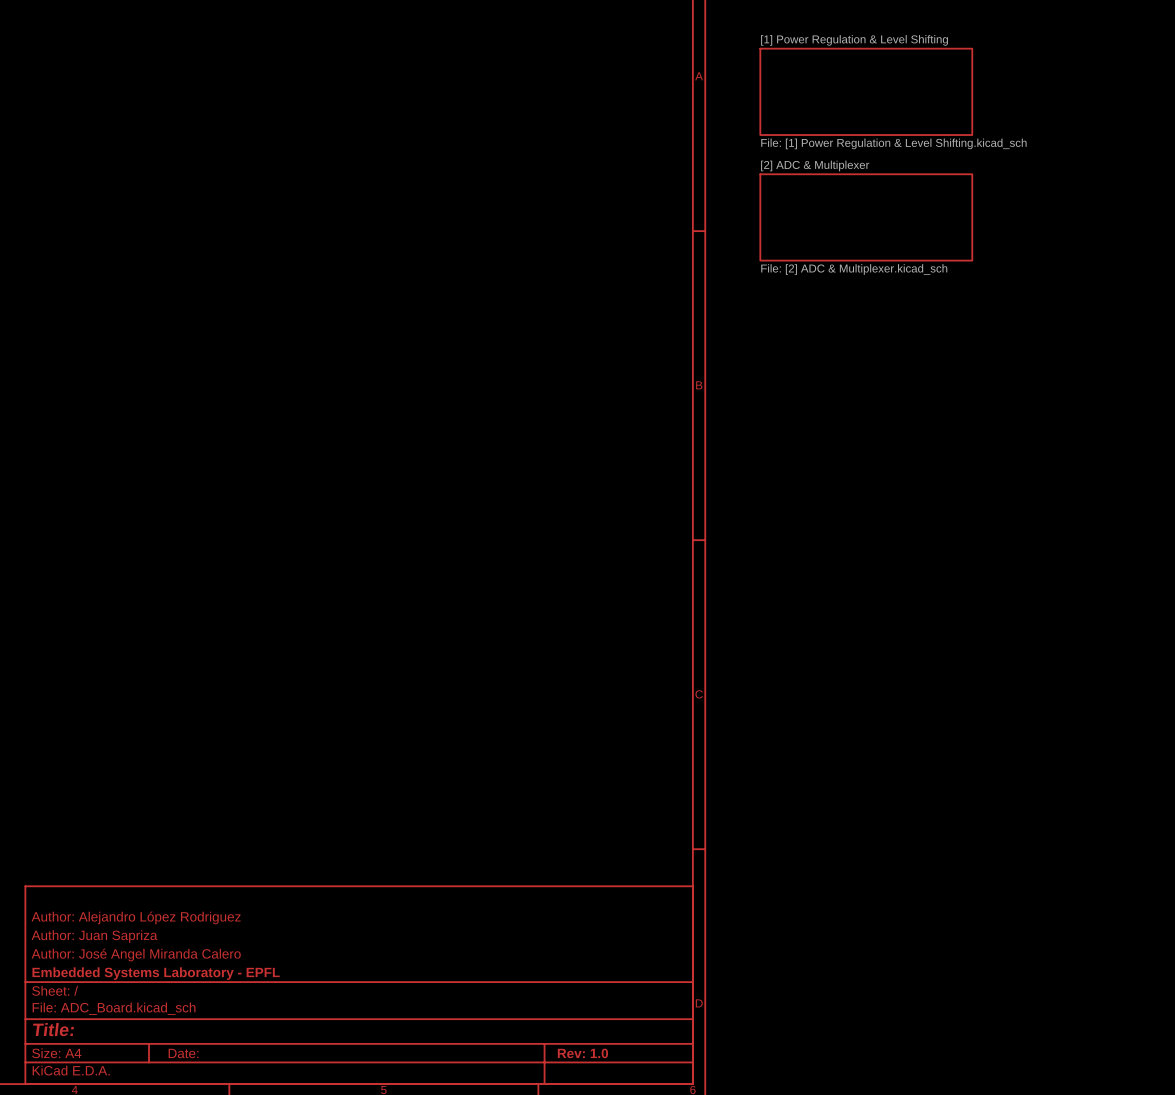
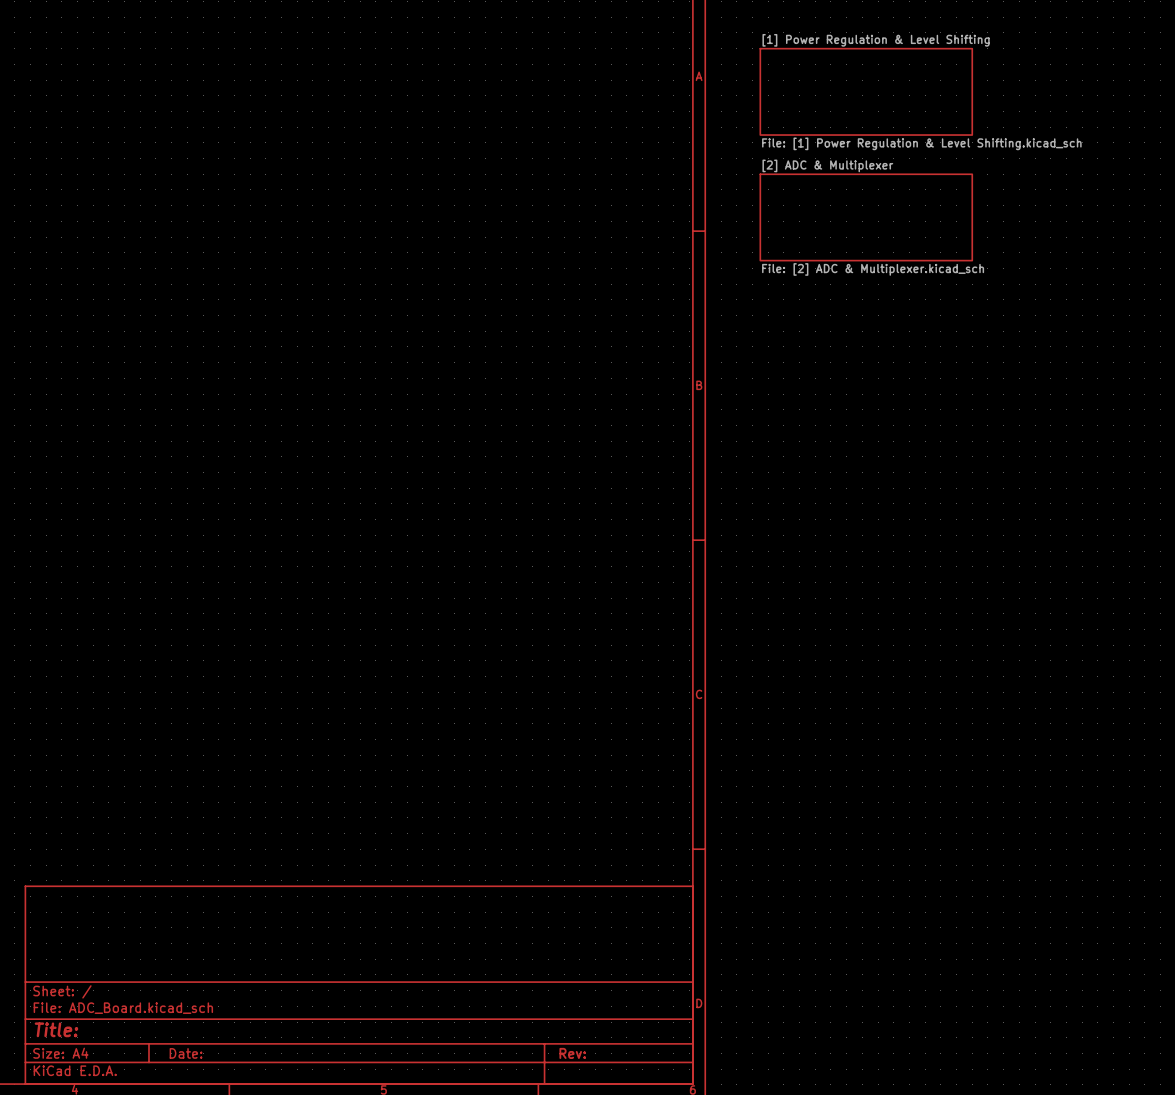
title block: Author: Alejandro López Rodriguez (136, 917) -> none
title block: Author: Juan Sapriza (94, 936) -> none
title block: Author: José Angel Miranda Calero (136, 954) -> none
title block: Embedded Systems Laboratory - EPFL (156, 973) -> none
title block: Rev: 1.0 (582, 1053) -> Rev: (572, 1053)

